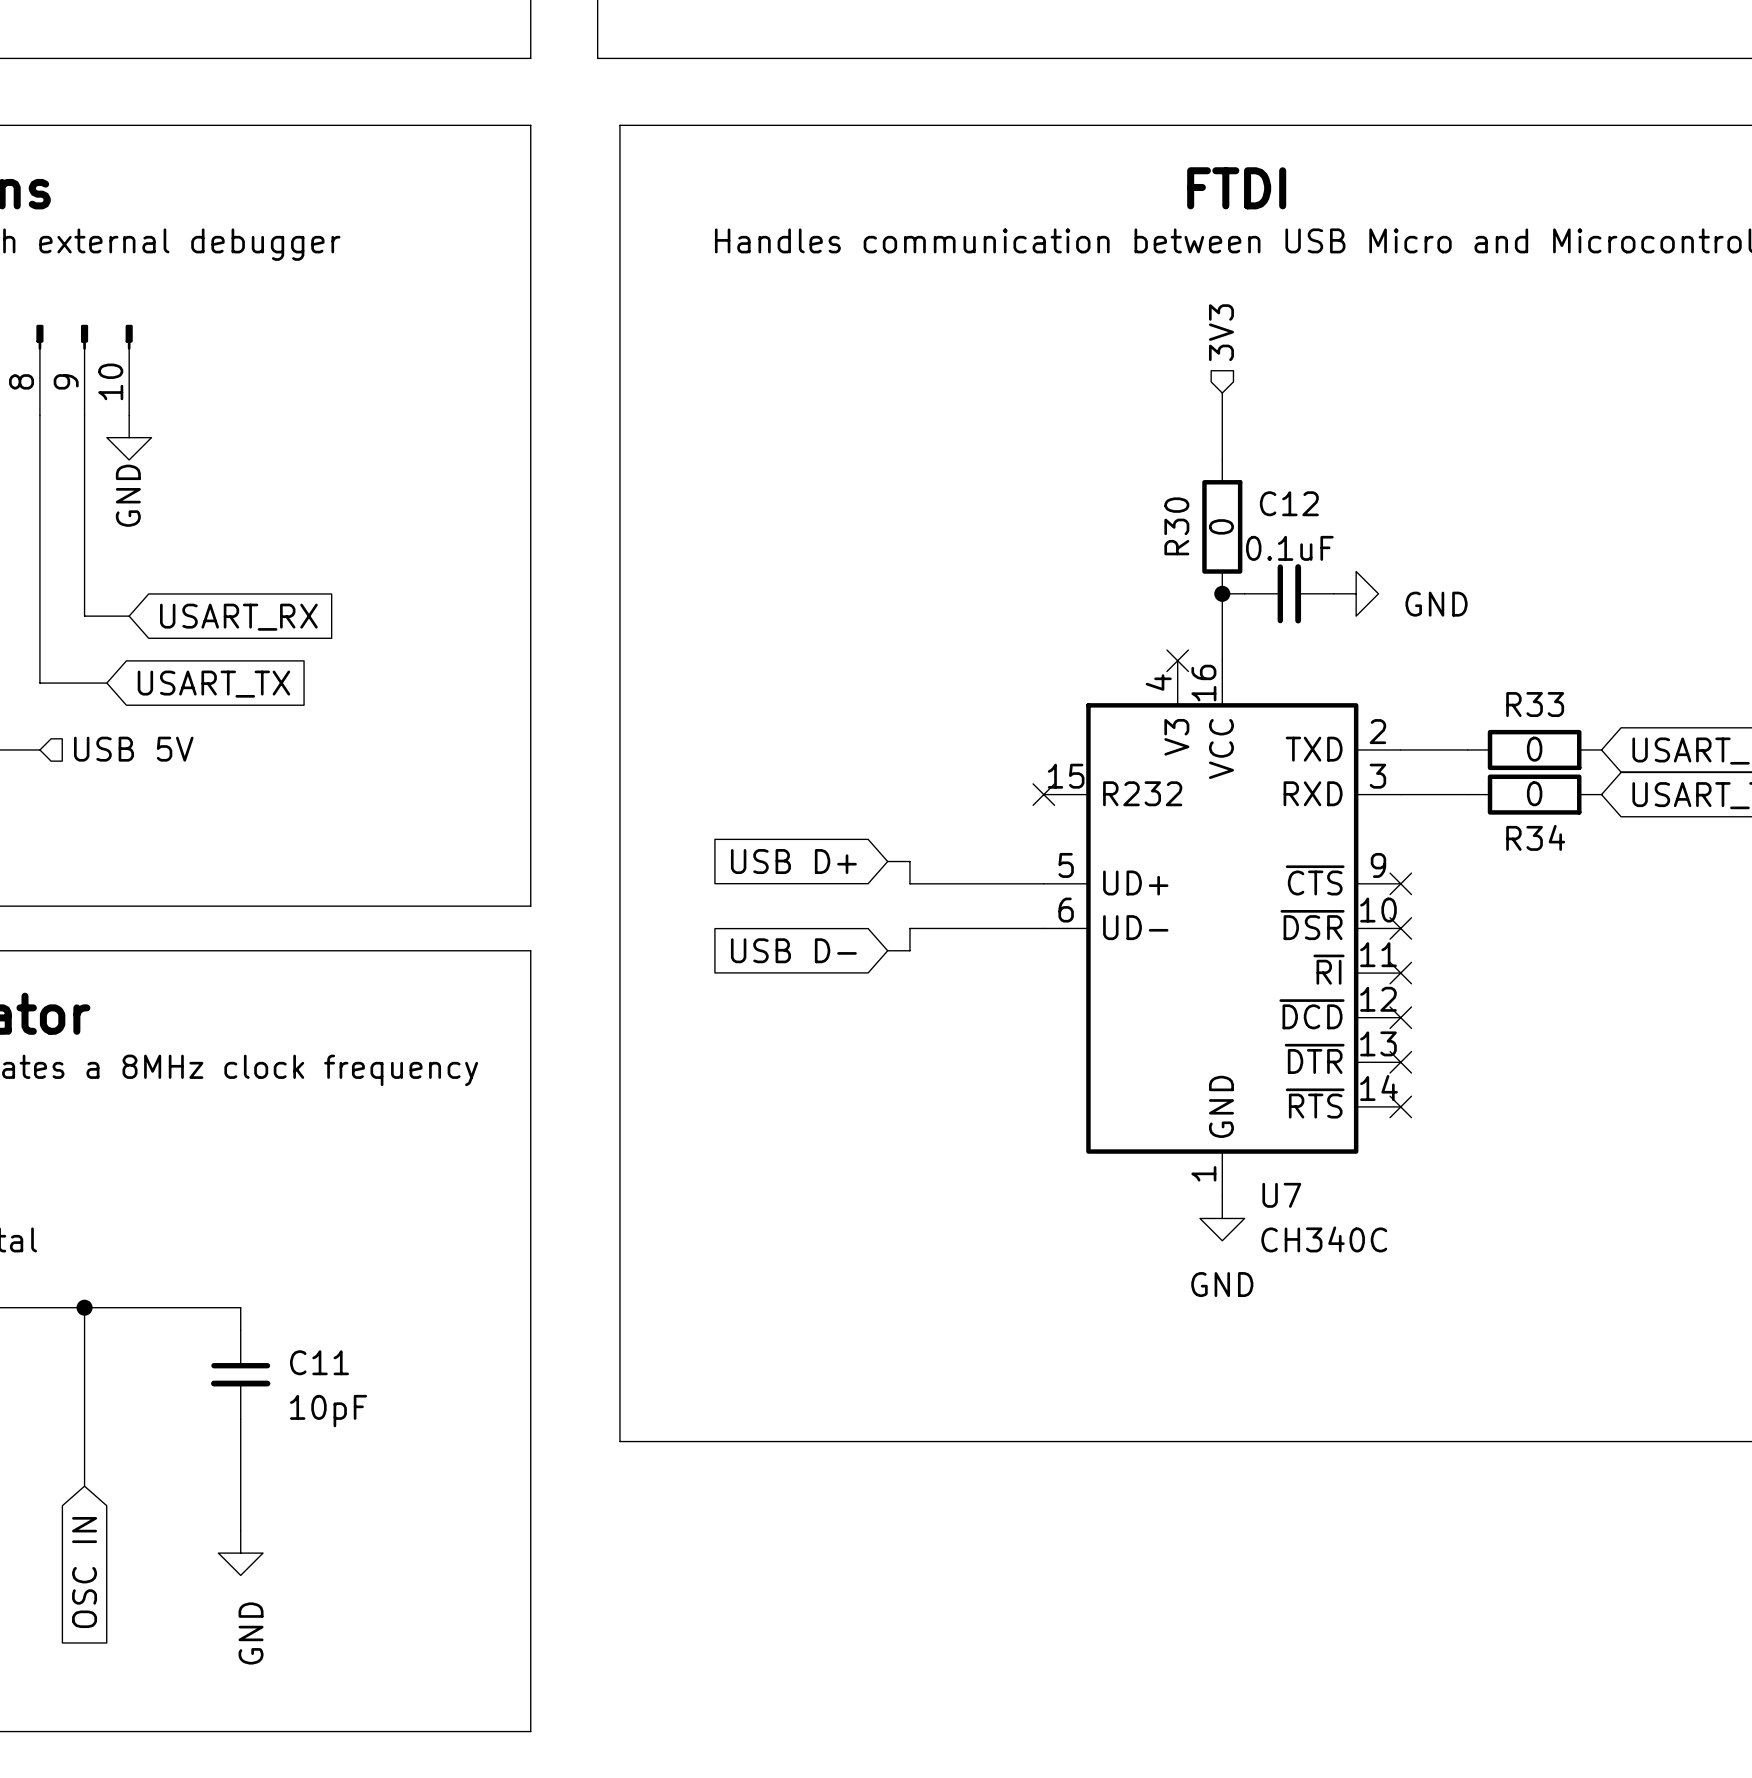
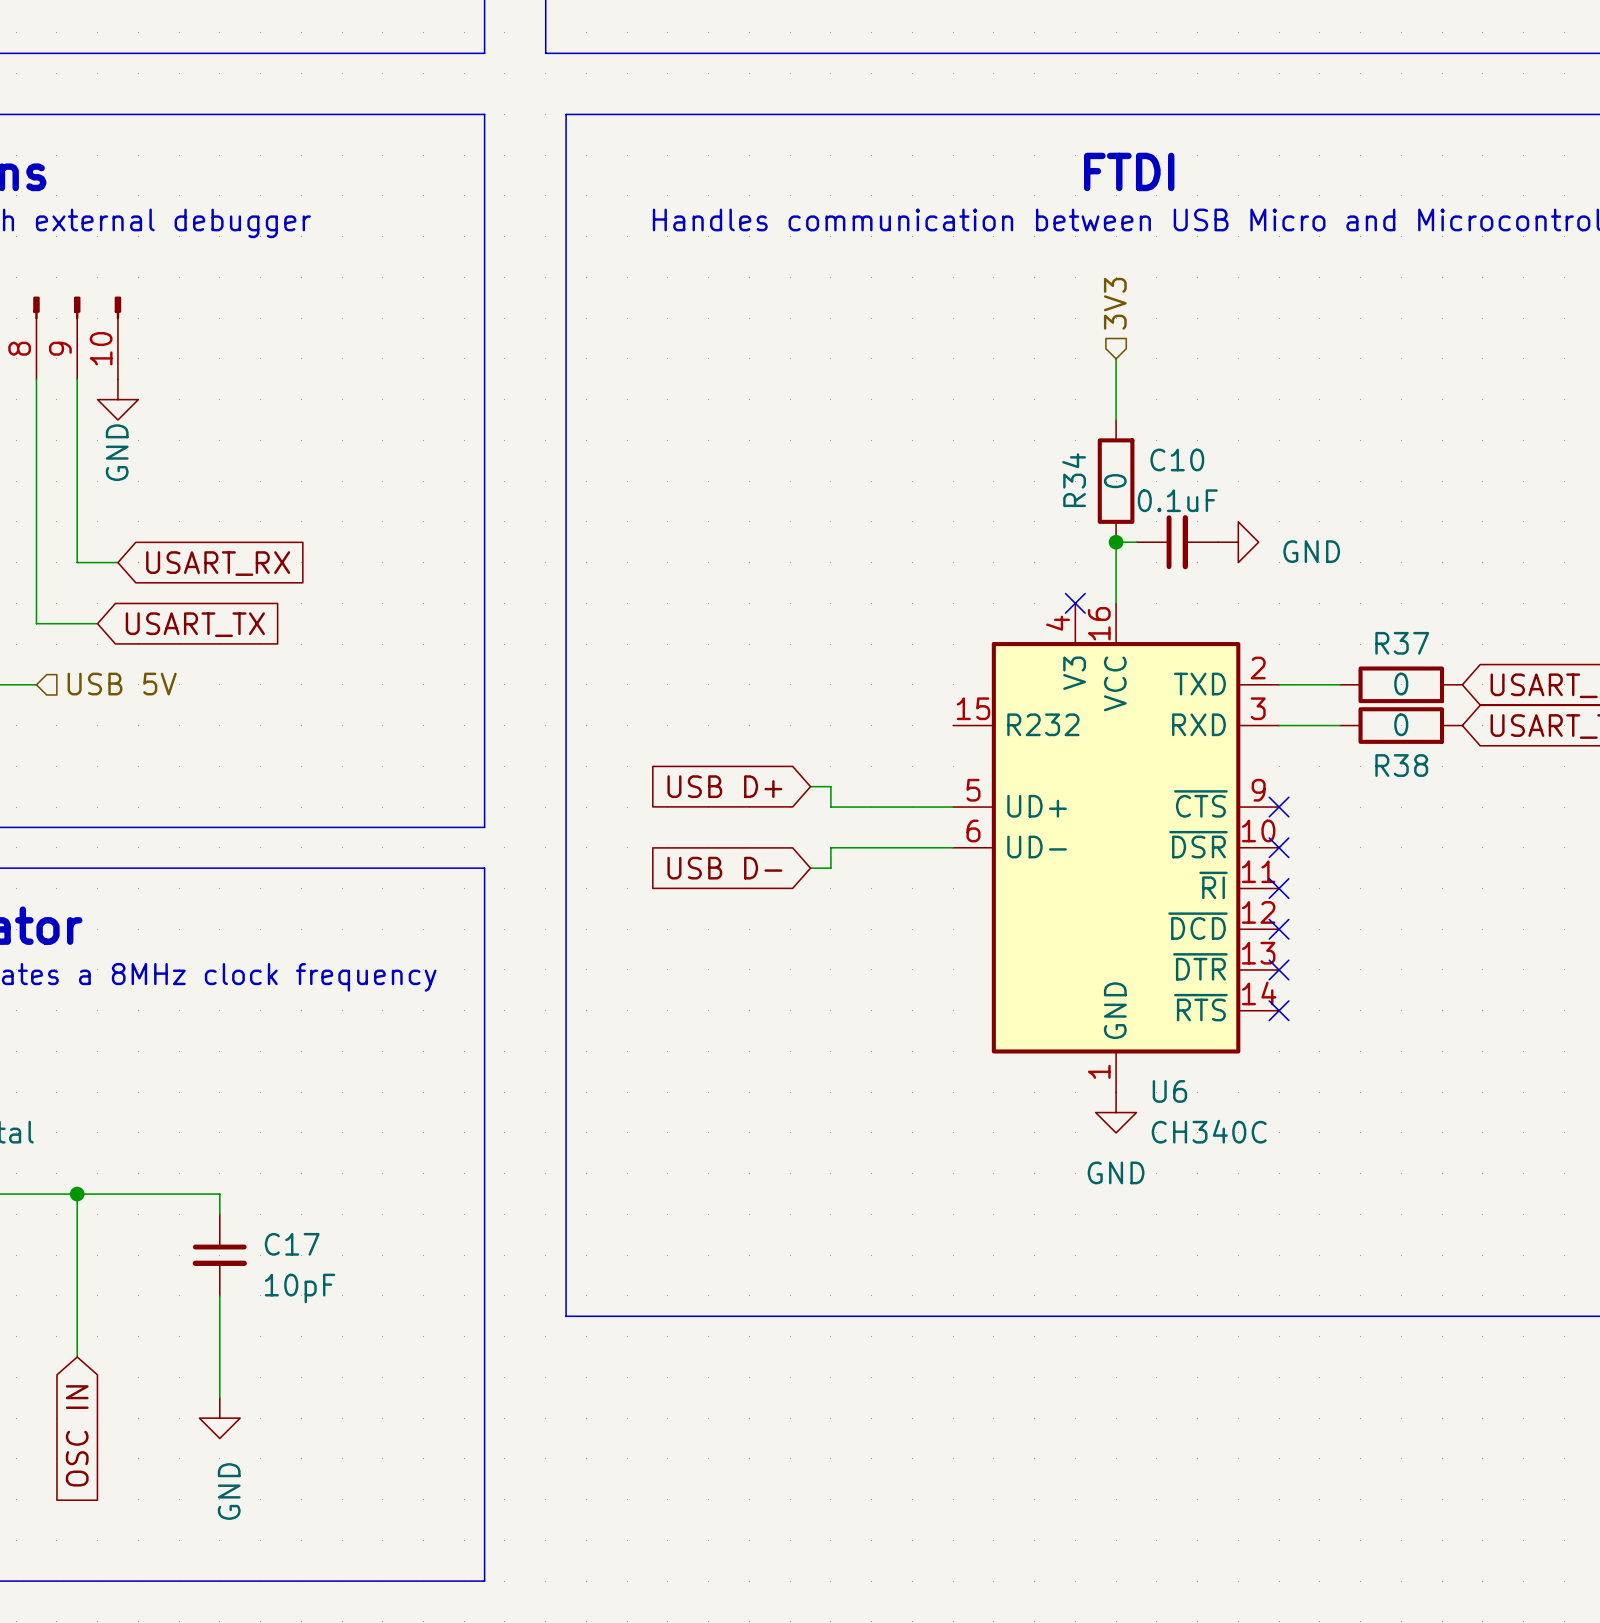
C12 name: C12 (1289, 503) -> C10 (1177, 459)
R30 name: R30 (1176, 526) -> R34 (1074, 480)
R33 name: R33 (1535, 704) -> R37 (1402, 643)
no-connect mark: (1043, 794) -> none
R34 name: R34 (1535, 837) -> R38 (1401, 765)
U7 name: U7 (1281, 1195) -> U6 (1169, 1091)
C11 name: C11 (319, 1362) -> C17 (292, 1244)

